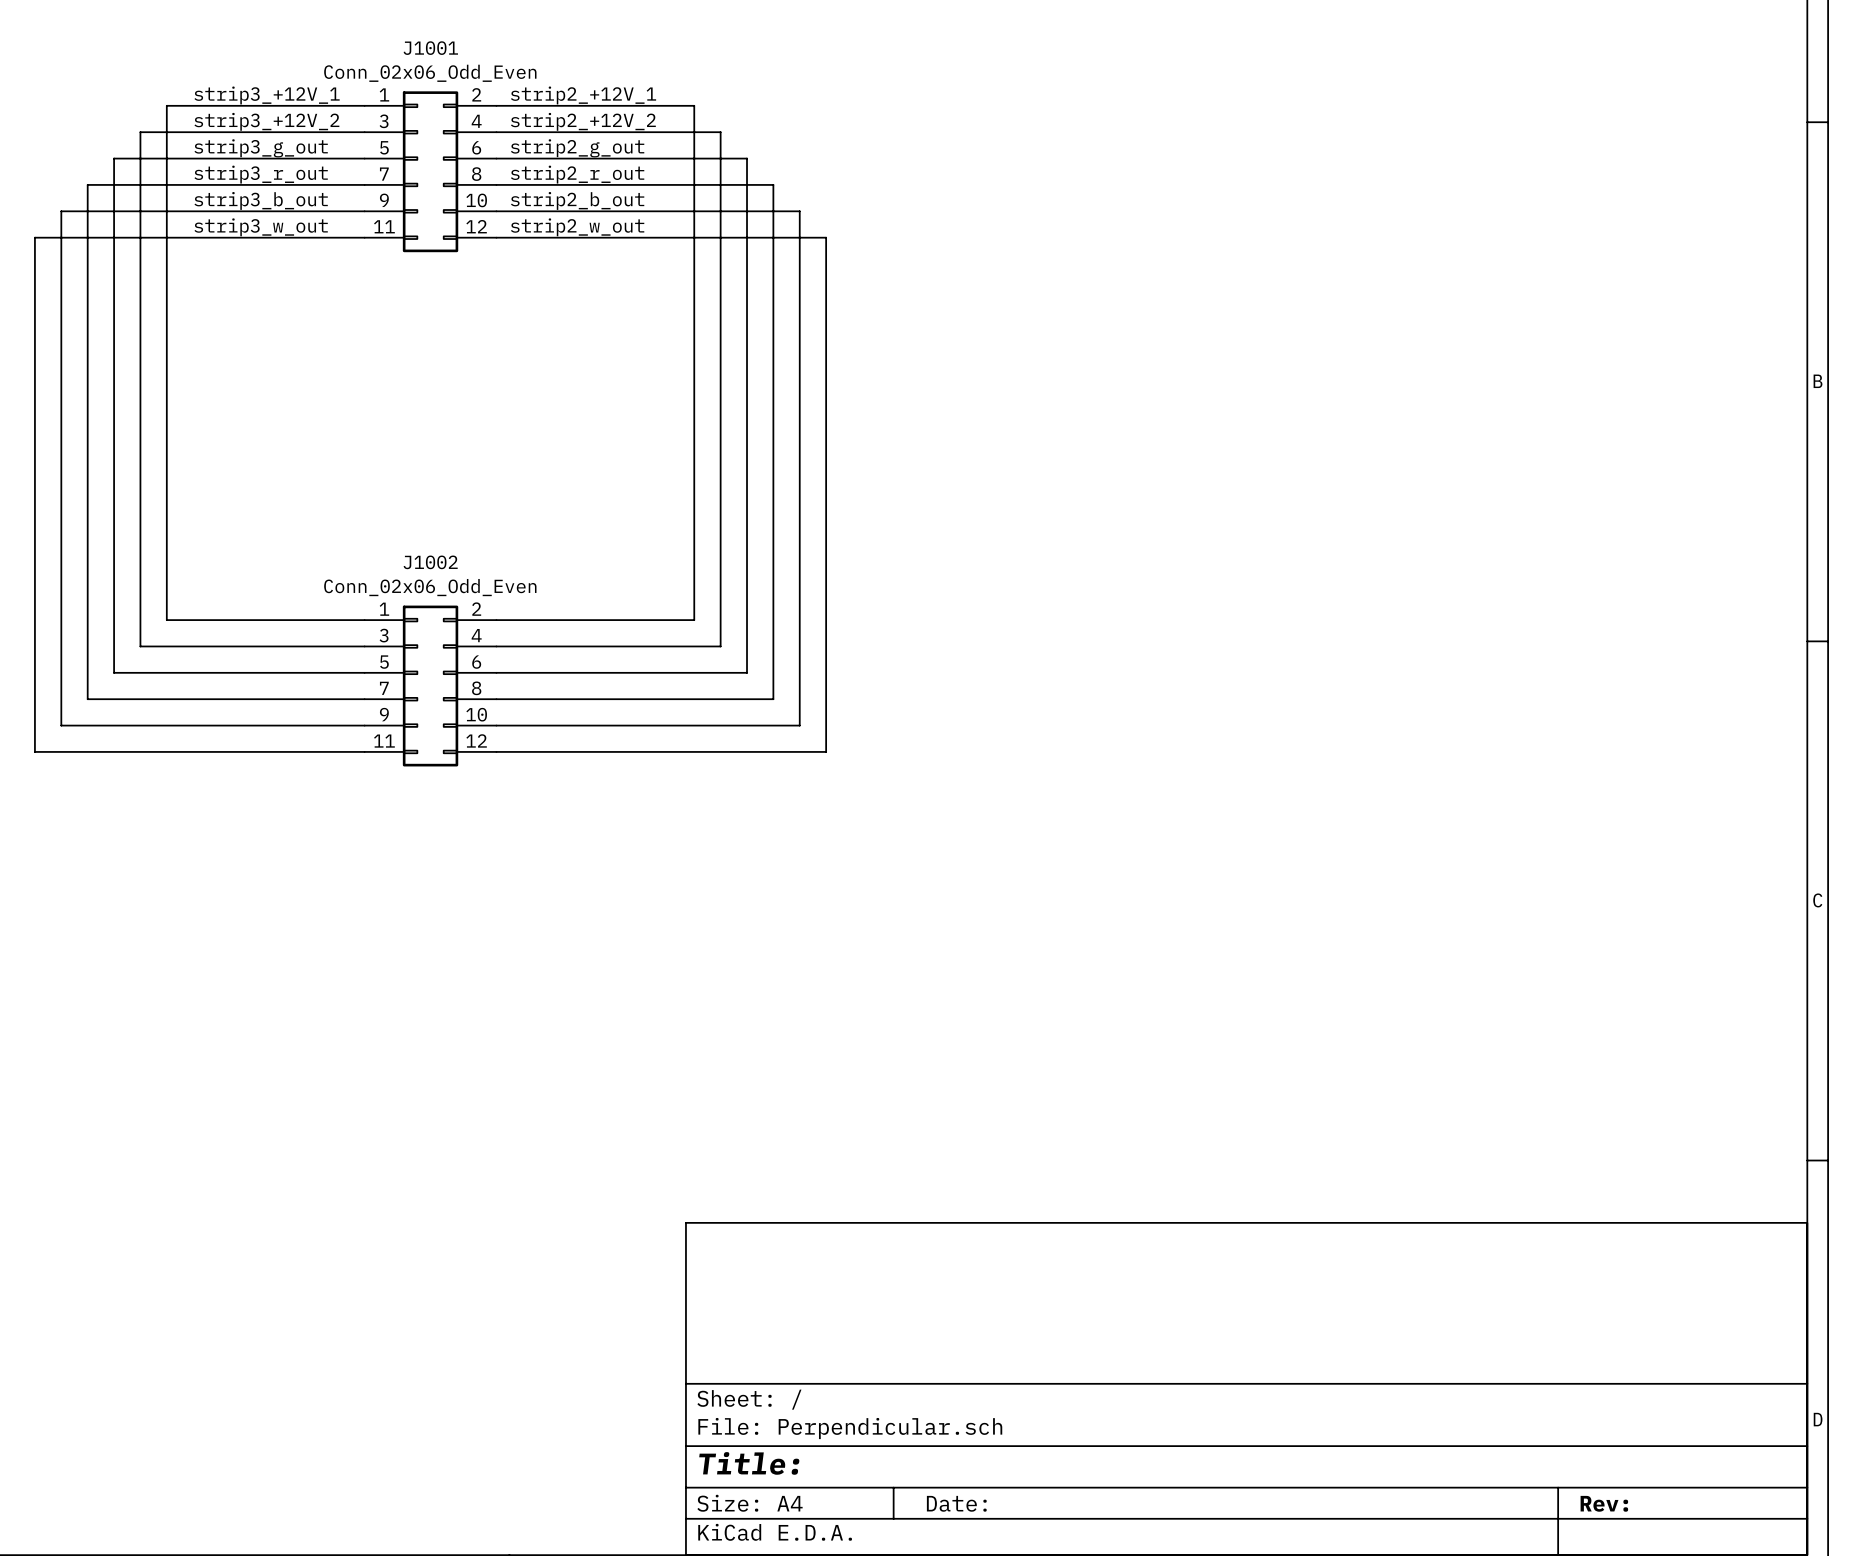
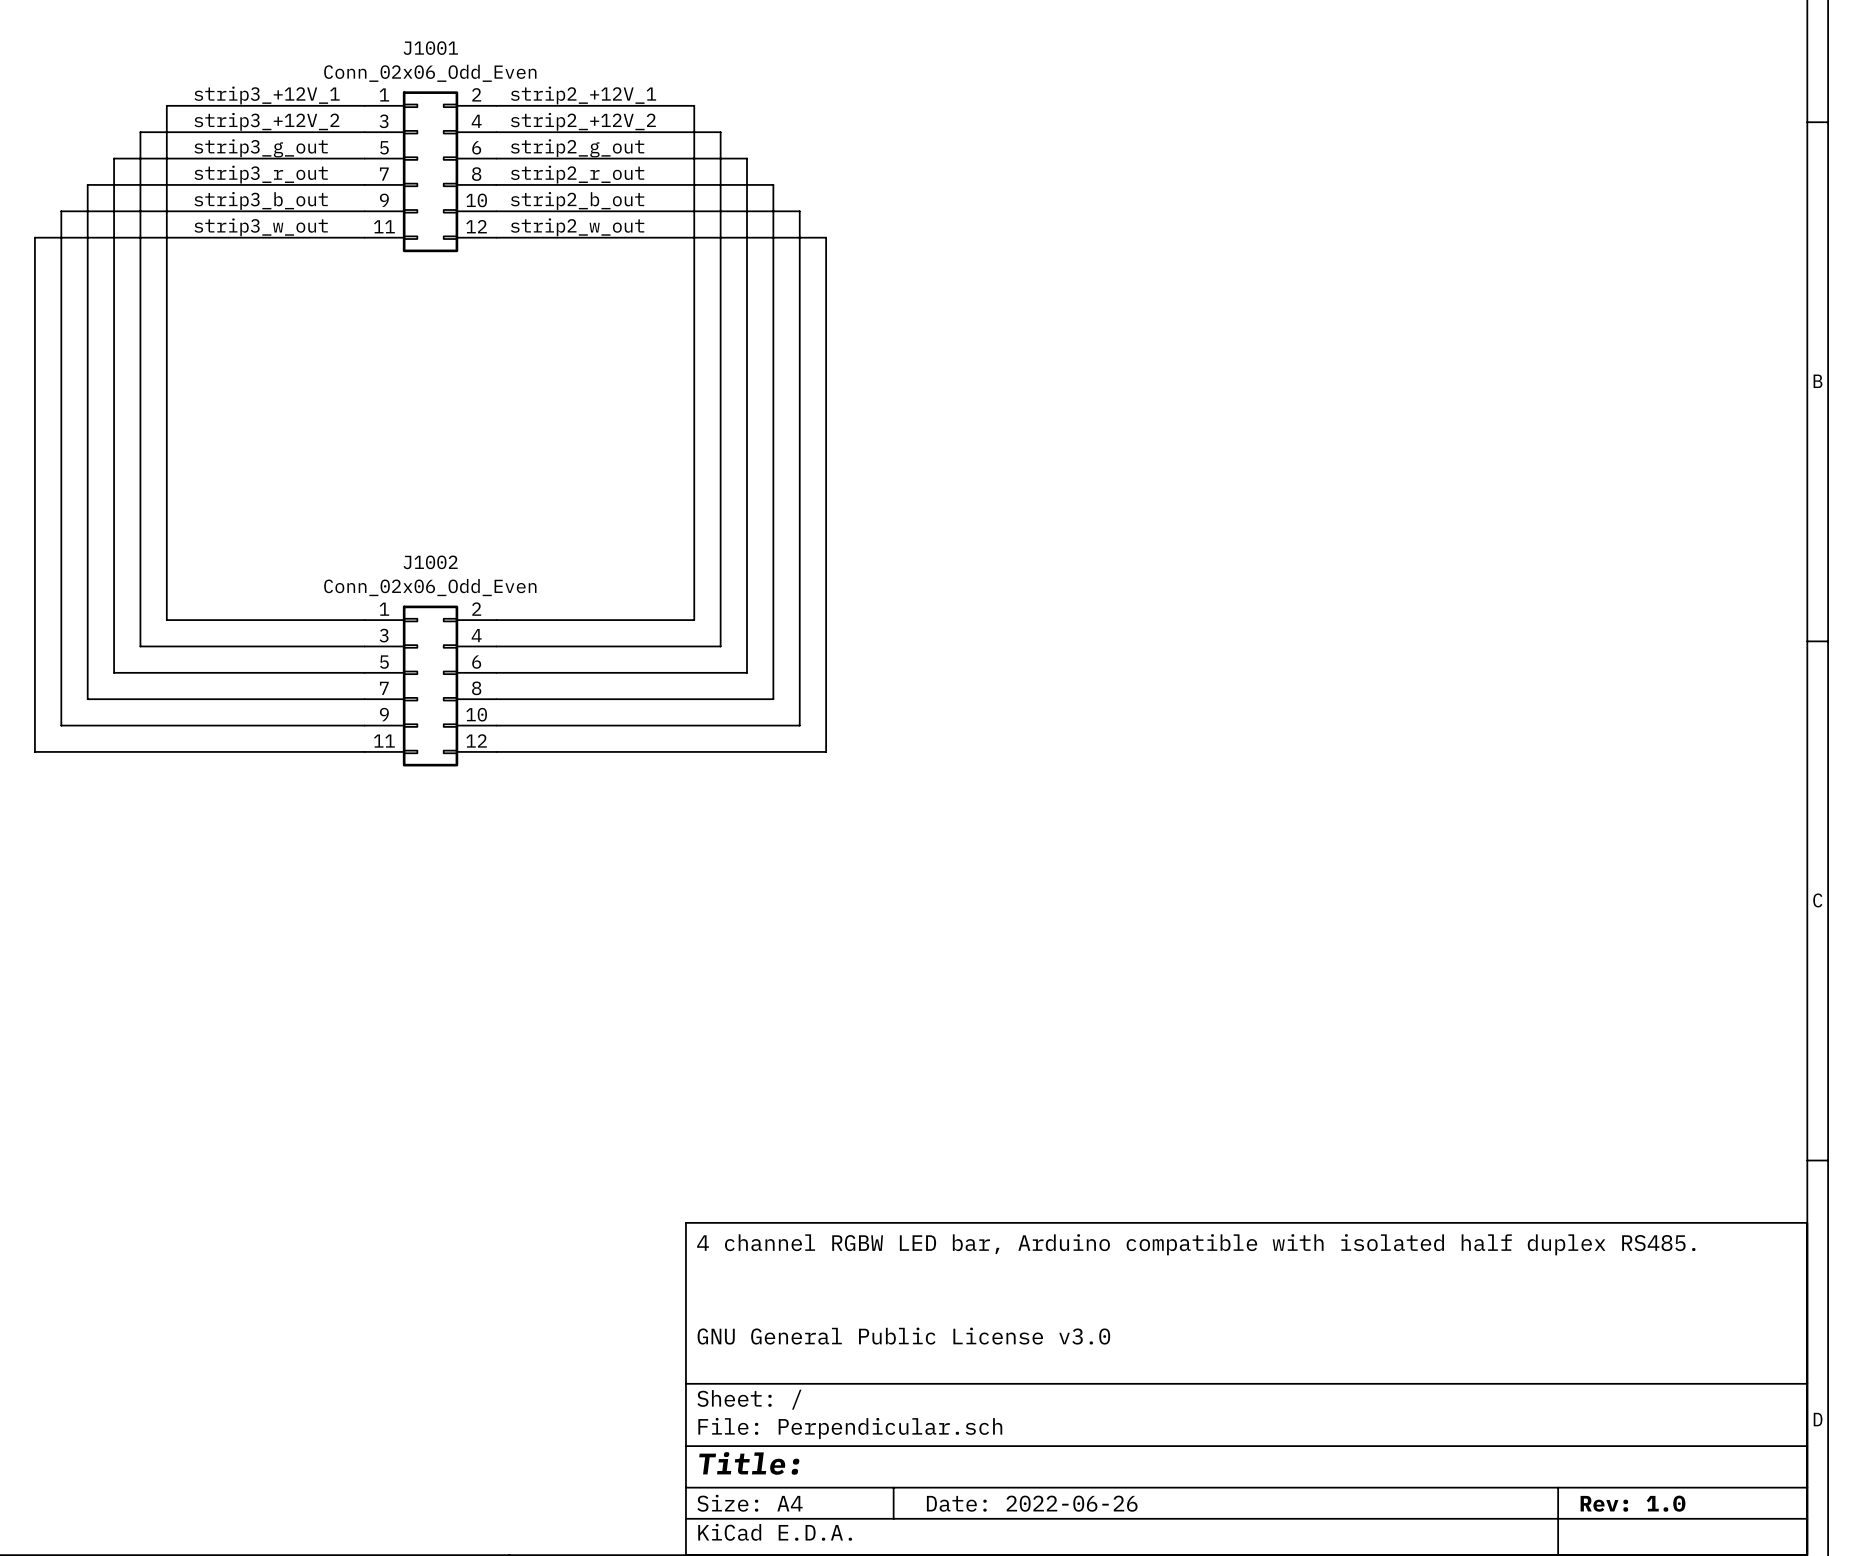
title block: none -> 4 channel RGBW LED bar, Arduino compatible with isolated half duplex RS485. (1196, 1244)
title block: none -> GNU General Public License v3.0 (903, 1336)
title block: Date: (956, 1503) -> Date: 2022-06-26 (1032, 1503)
title block: Rev: (1604, 1503) -> Rev: 1.0 (1632, 1503)

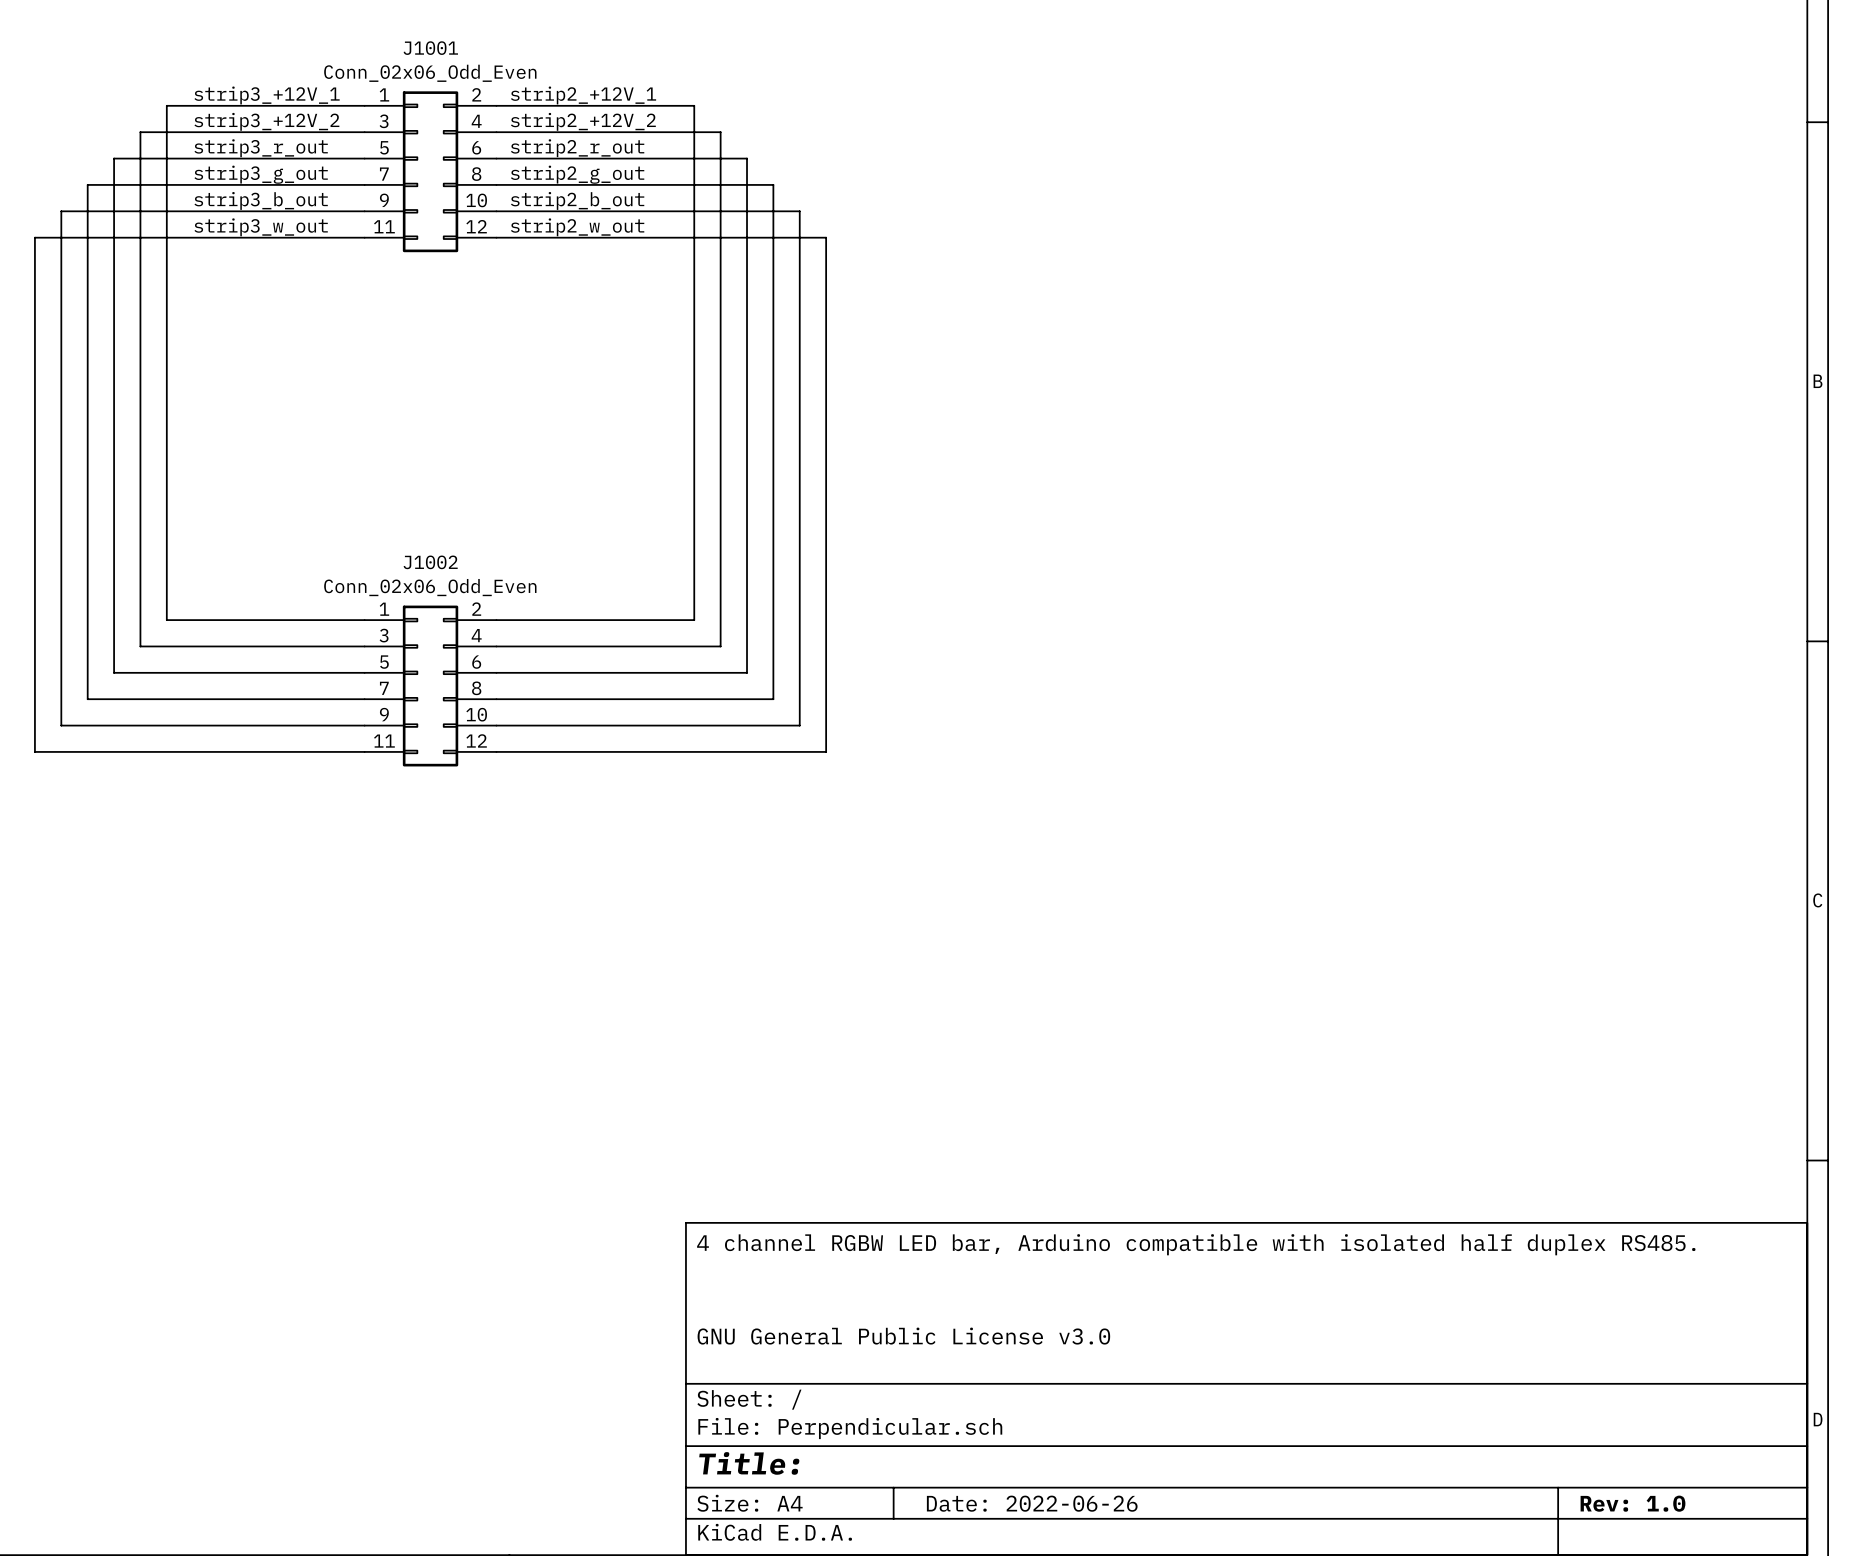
label: strip3_g_out (261, 148) -> strip3_r_out (261, 148)
label: strip2_g_out (577, 148) -> strip2_r_out (577, 148)
label: strip3_r_out (261, 174) -> strip3_g_out (261, 174)
label: strip2_r_out (577, 174) -> strip2_g_out (577, 174)

